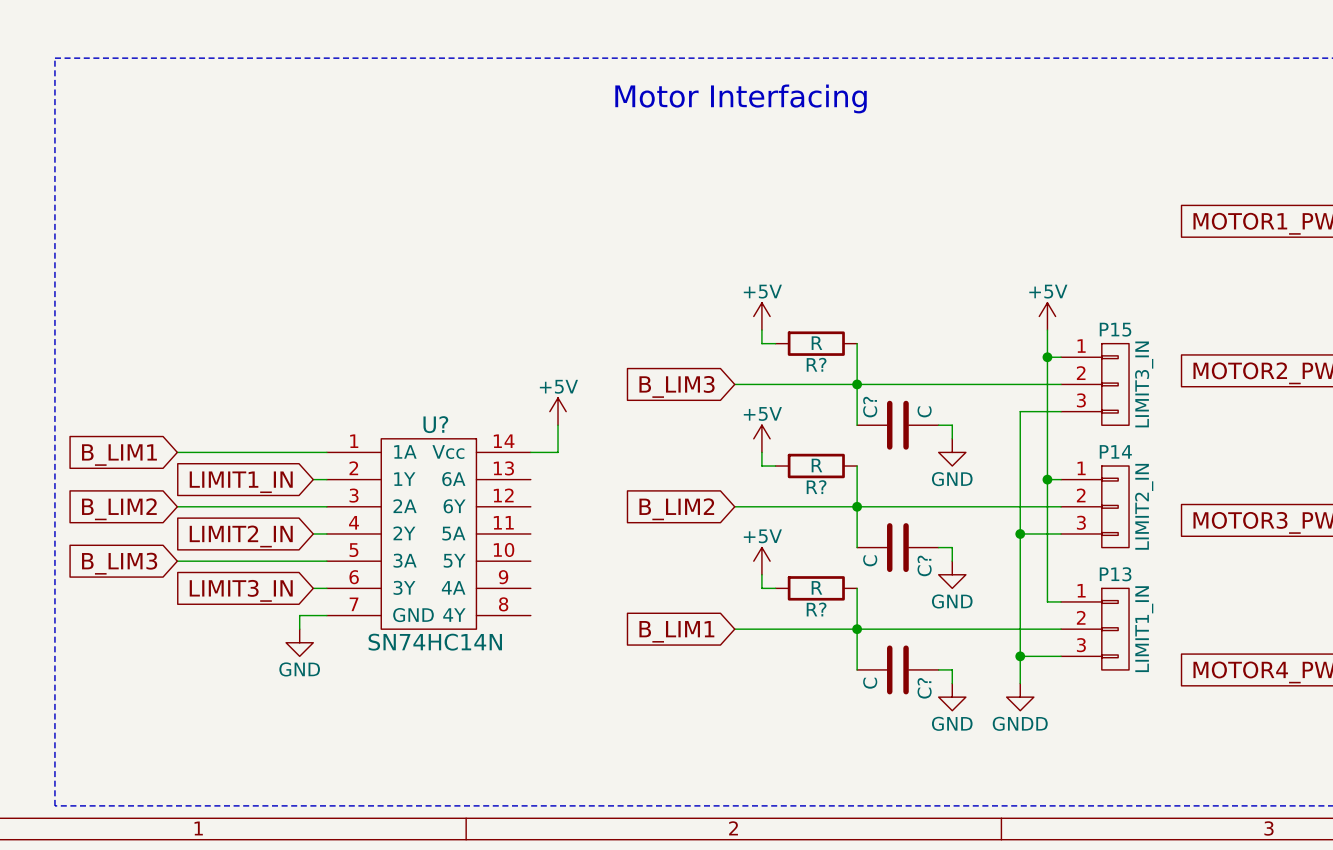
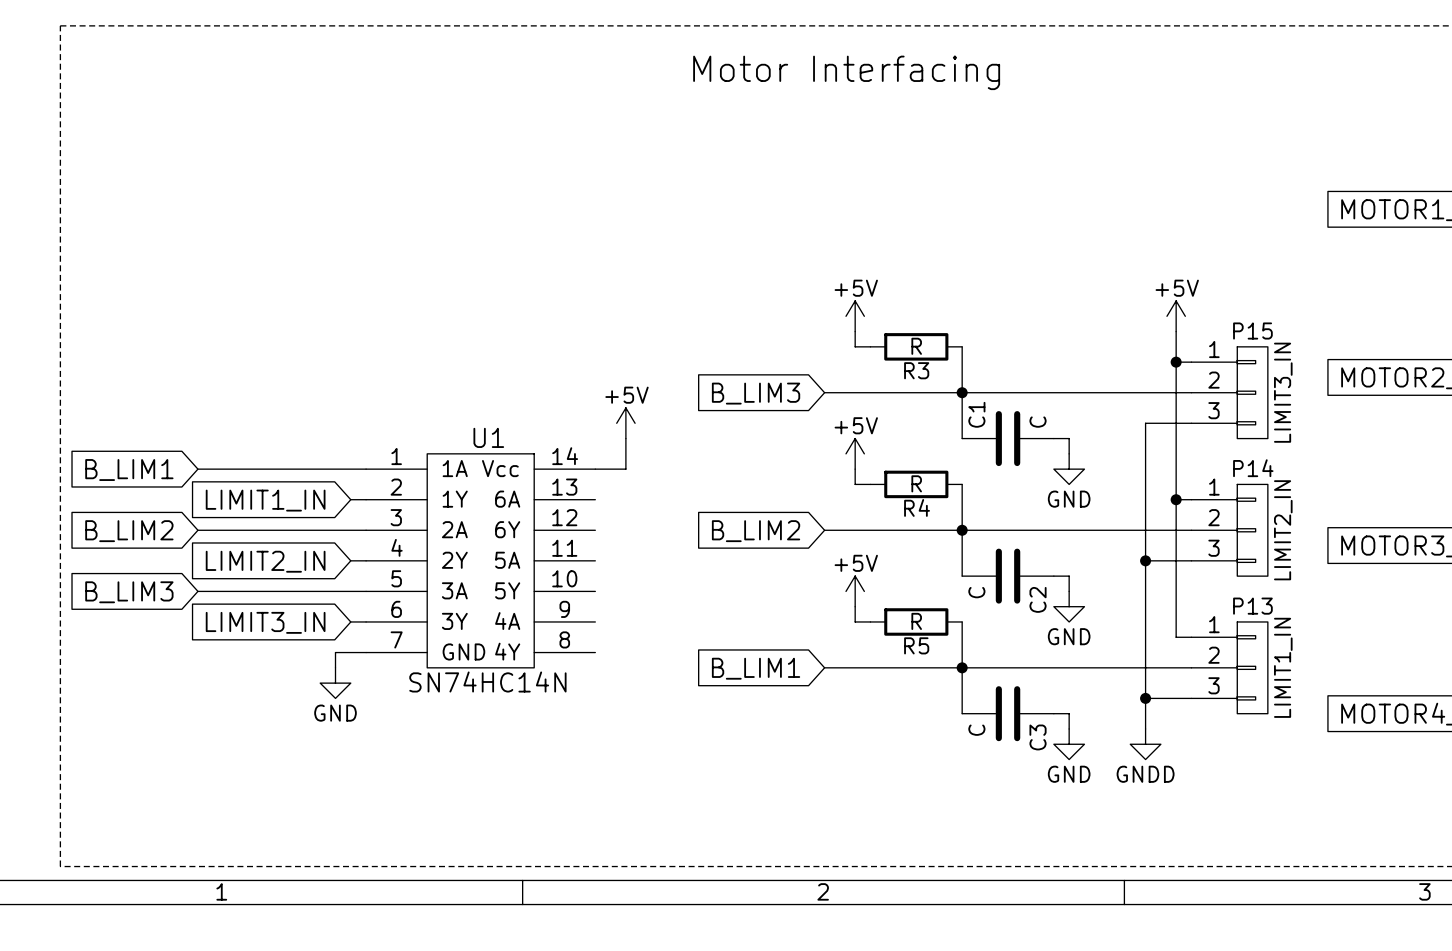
R? name: R? (816, 364) -> R3 (916, 370)
C? name: C? (870, 407) -> C1 (976, 414)
U? name: U? (435, 424) -> U1 (488, 437)
R? name: R? (816, 487) -> R4 (917, 507)
C? name: C? (924, 565) -> C2 (1038, 599)
R? name: R? (816, 609) -> R5 (916, 645)
C? name: C? (924, 688) -> C3 (1038, 737)

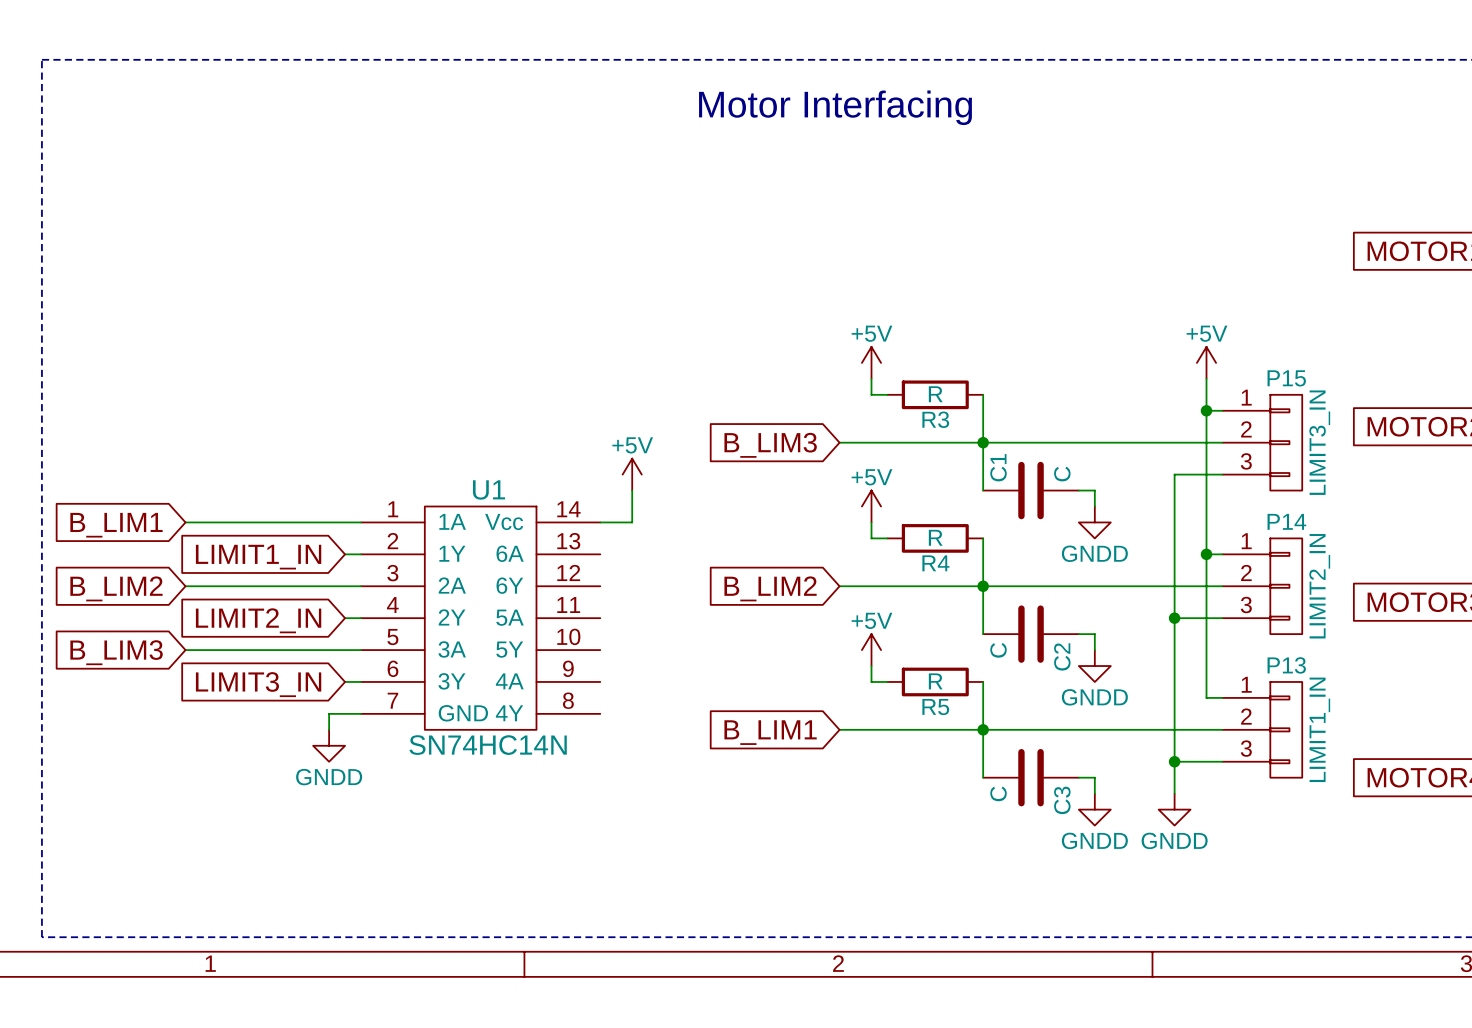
power symbol: GND (1069, 469) -> GNDD (1094, 522)
power symbol: GND (1069, 606) -> GNDD (1094, 666)
power symbol: GND (335, 683) -> GNDD (329, 745)
power symbol: GND (1069, 744) -> GNDD (1094, 809)

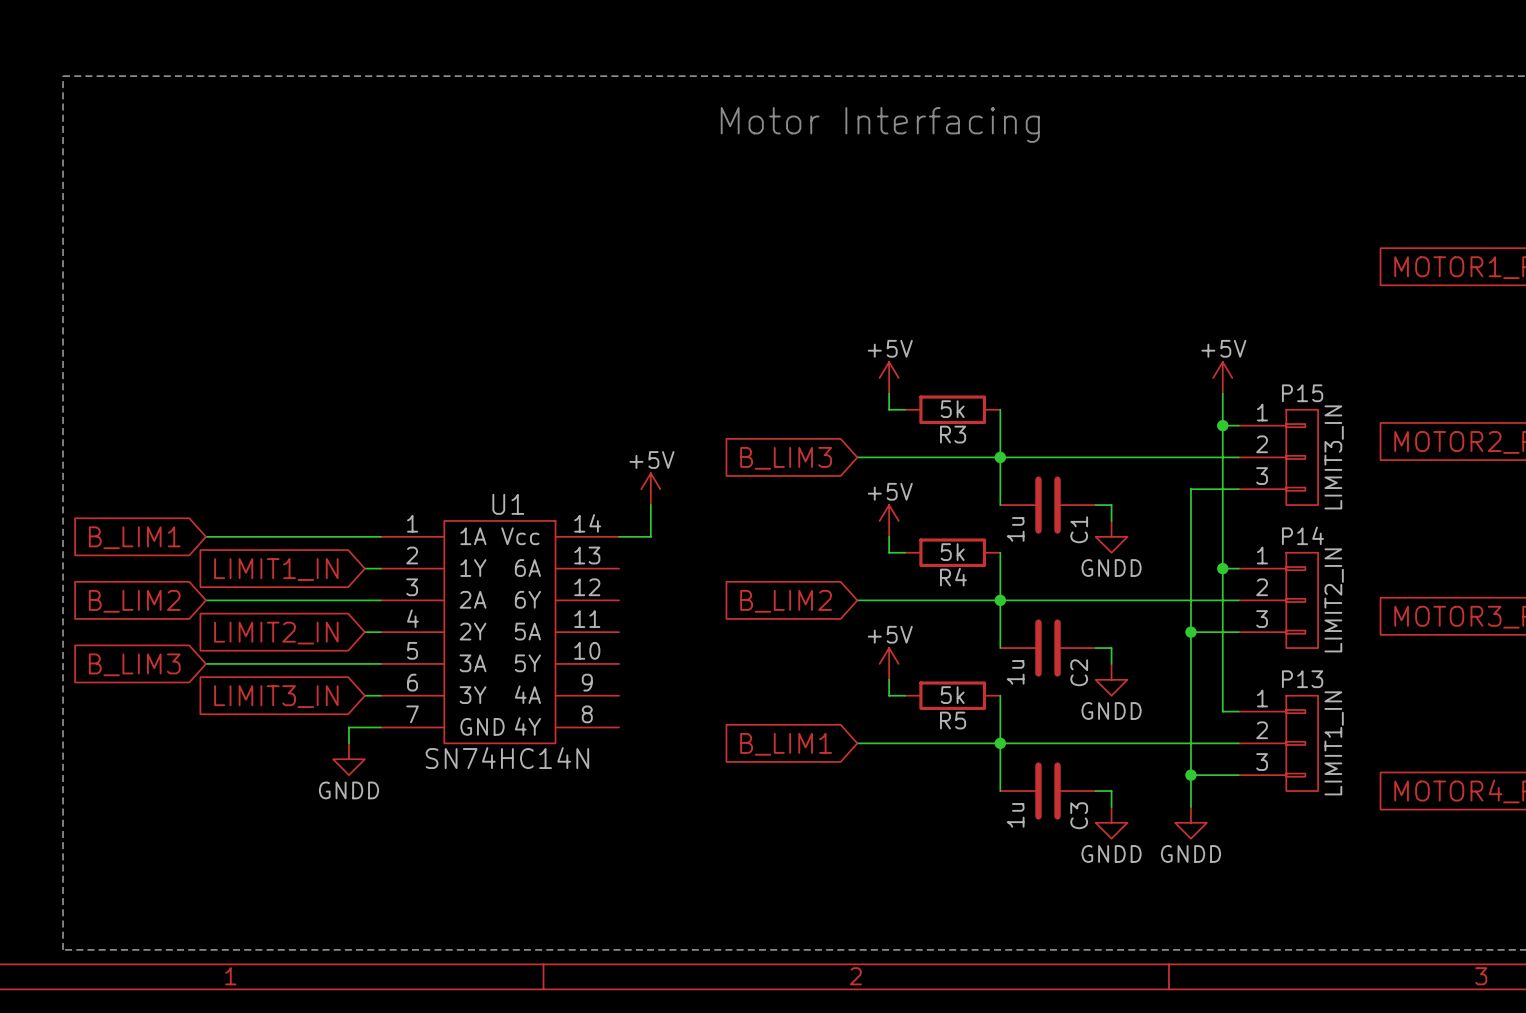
R3 value: R (935, 394) -> 5k (952, 409)
C1 name position: C1 (998, 467) -> C1 (1079, 529)
C1 value: C (1062, 474) -> 1u (1015, 529)
R4 value: R (935, 537) -> 5k (952, 552)
C2 value: C (998, 650) -> 1u (1015, 672)
R5 value: R (935, 681) -> 5k (952, 695)
C3 value: C (998, 793) -> 1u (1015, 815)

